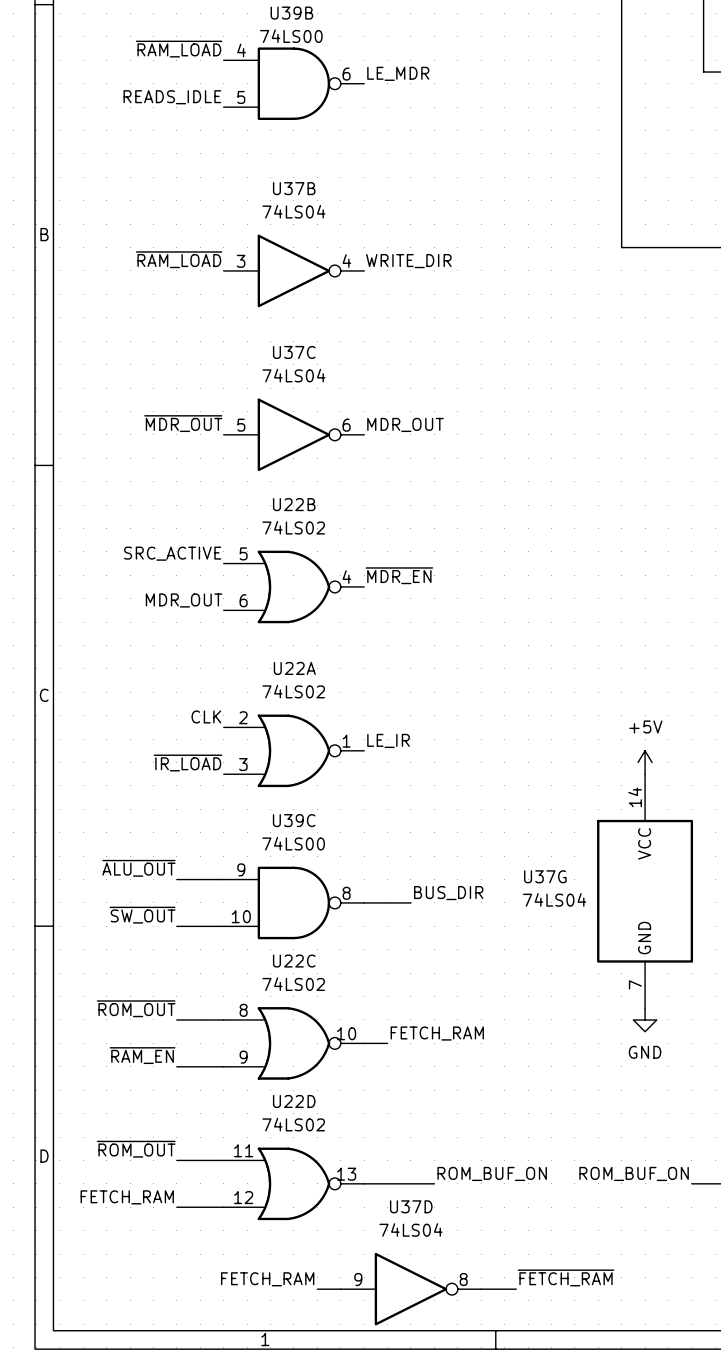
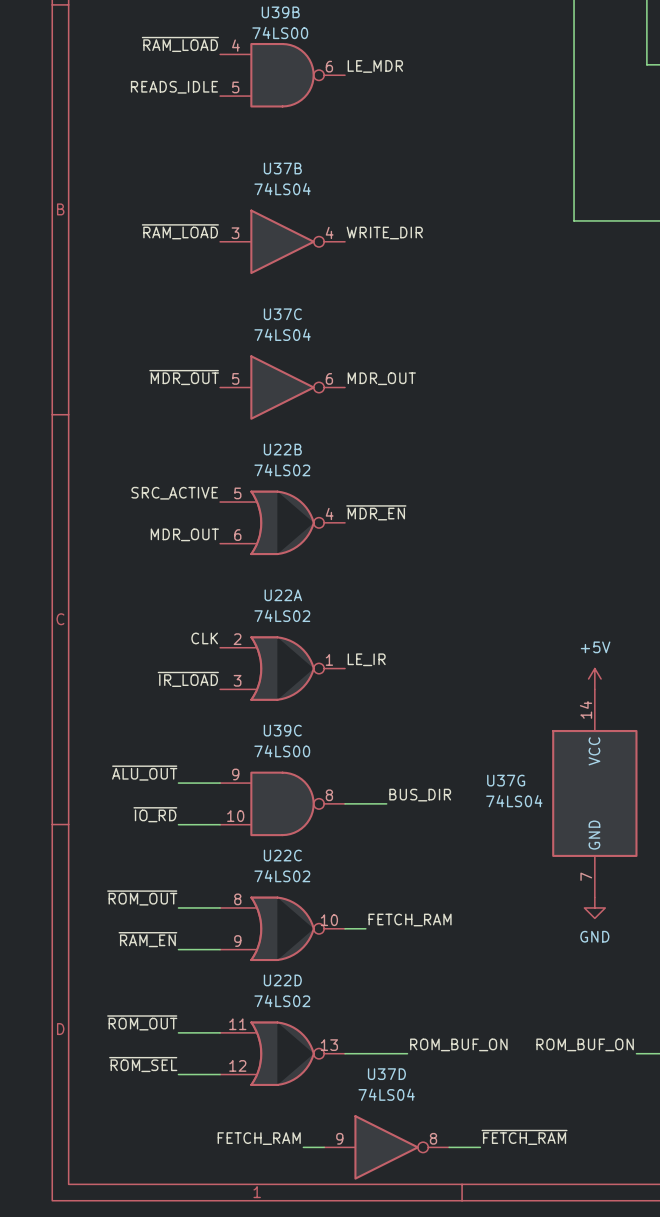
label: ~{SW_OUT} (142, 915) -> ~{IO_RD} (155, 814)
label: FETCH_RAM (127, 1197) -> ~{ROM_SEL} (143, 1064)

